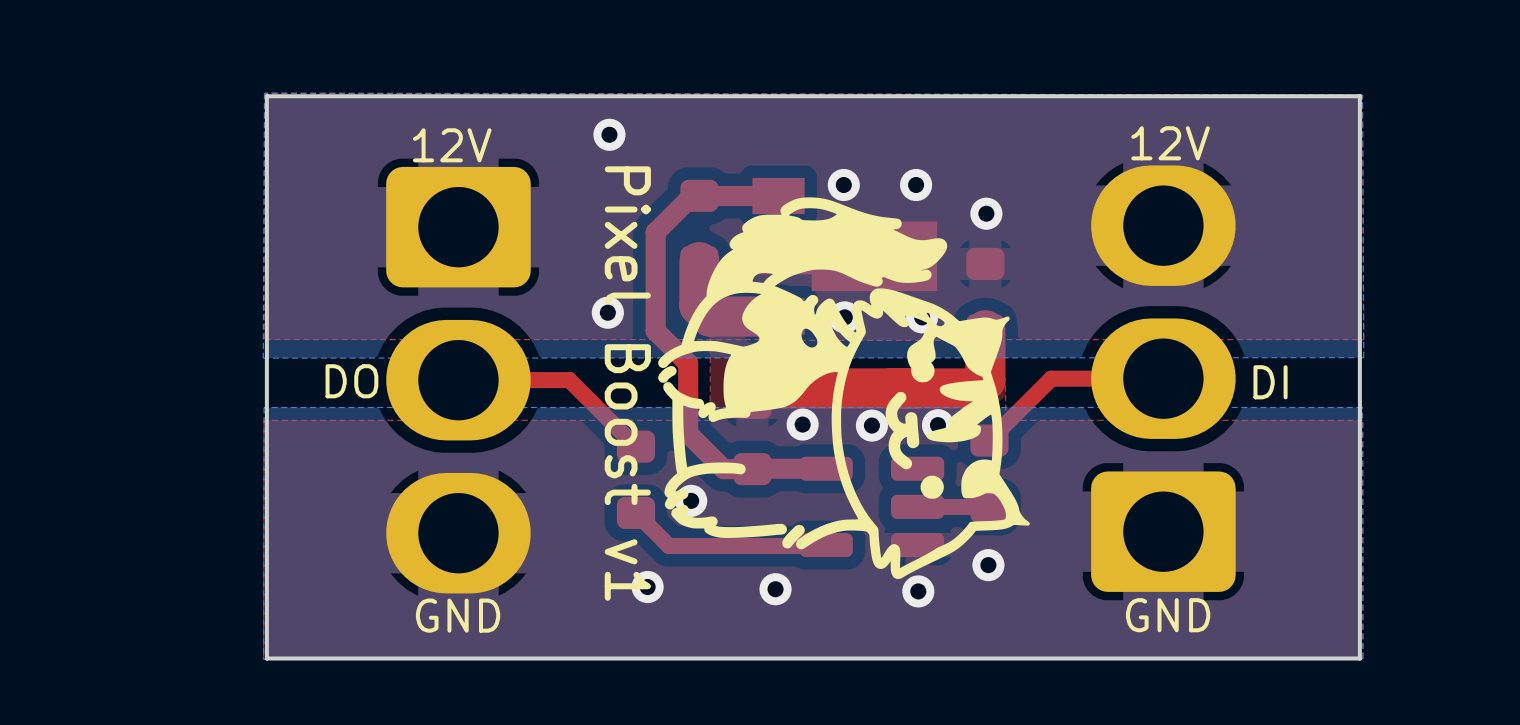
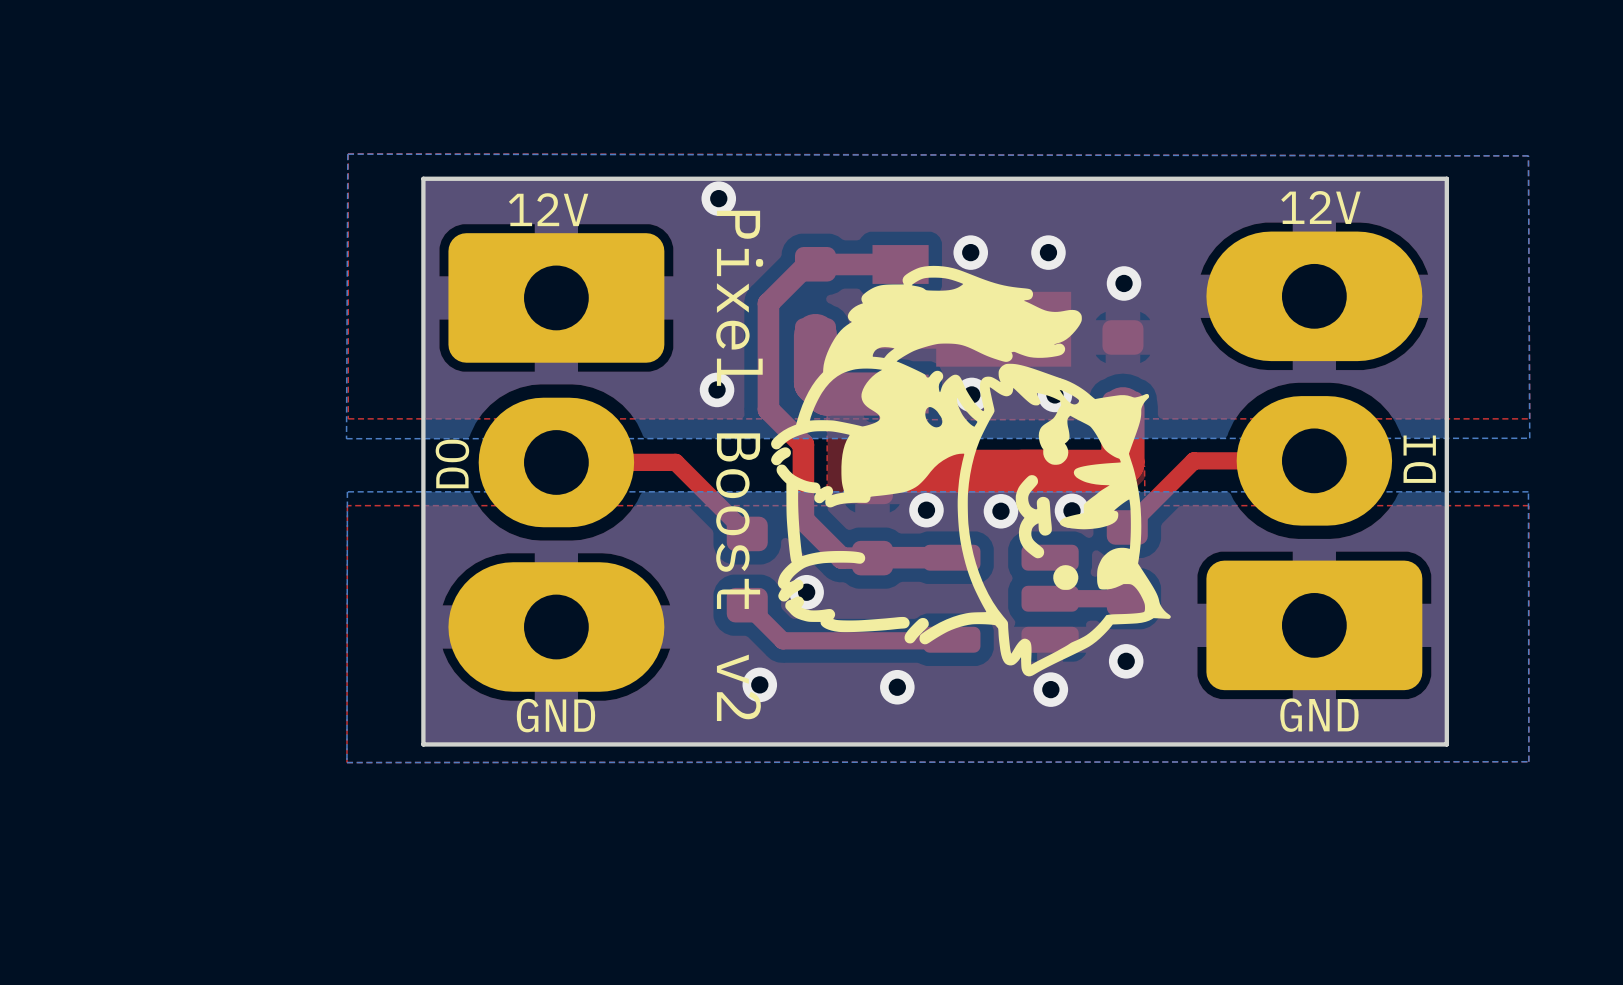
board edge: (1359, 96) (266, 96) (266, 658) (1359, 658) (1359, 96) -> (1446, 178) (1446, 744) (423, 744) (423, 178) (1446, 178)
part footprint: [1091, 165, 1236, 592] -> [1206, 231, 1423, 691]
part footprint: [386, 166, 531, 594] -> [448, 233, 665, 692]
text rotation: 0° (351, 381) -> 90° counterclockwise (452, 463)
text rotation: 0° (1270, 382) -> 90° counterclockwise (1419, 459)
text: Pixel Boost v1 (627, 383) -> Pixel Boost v2 (739, 465)

